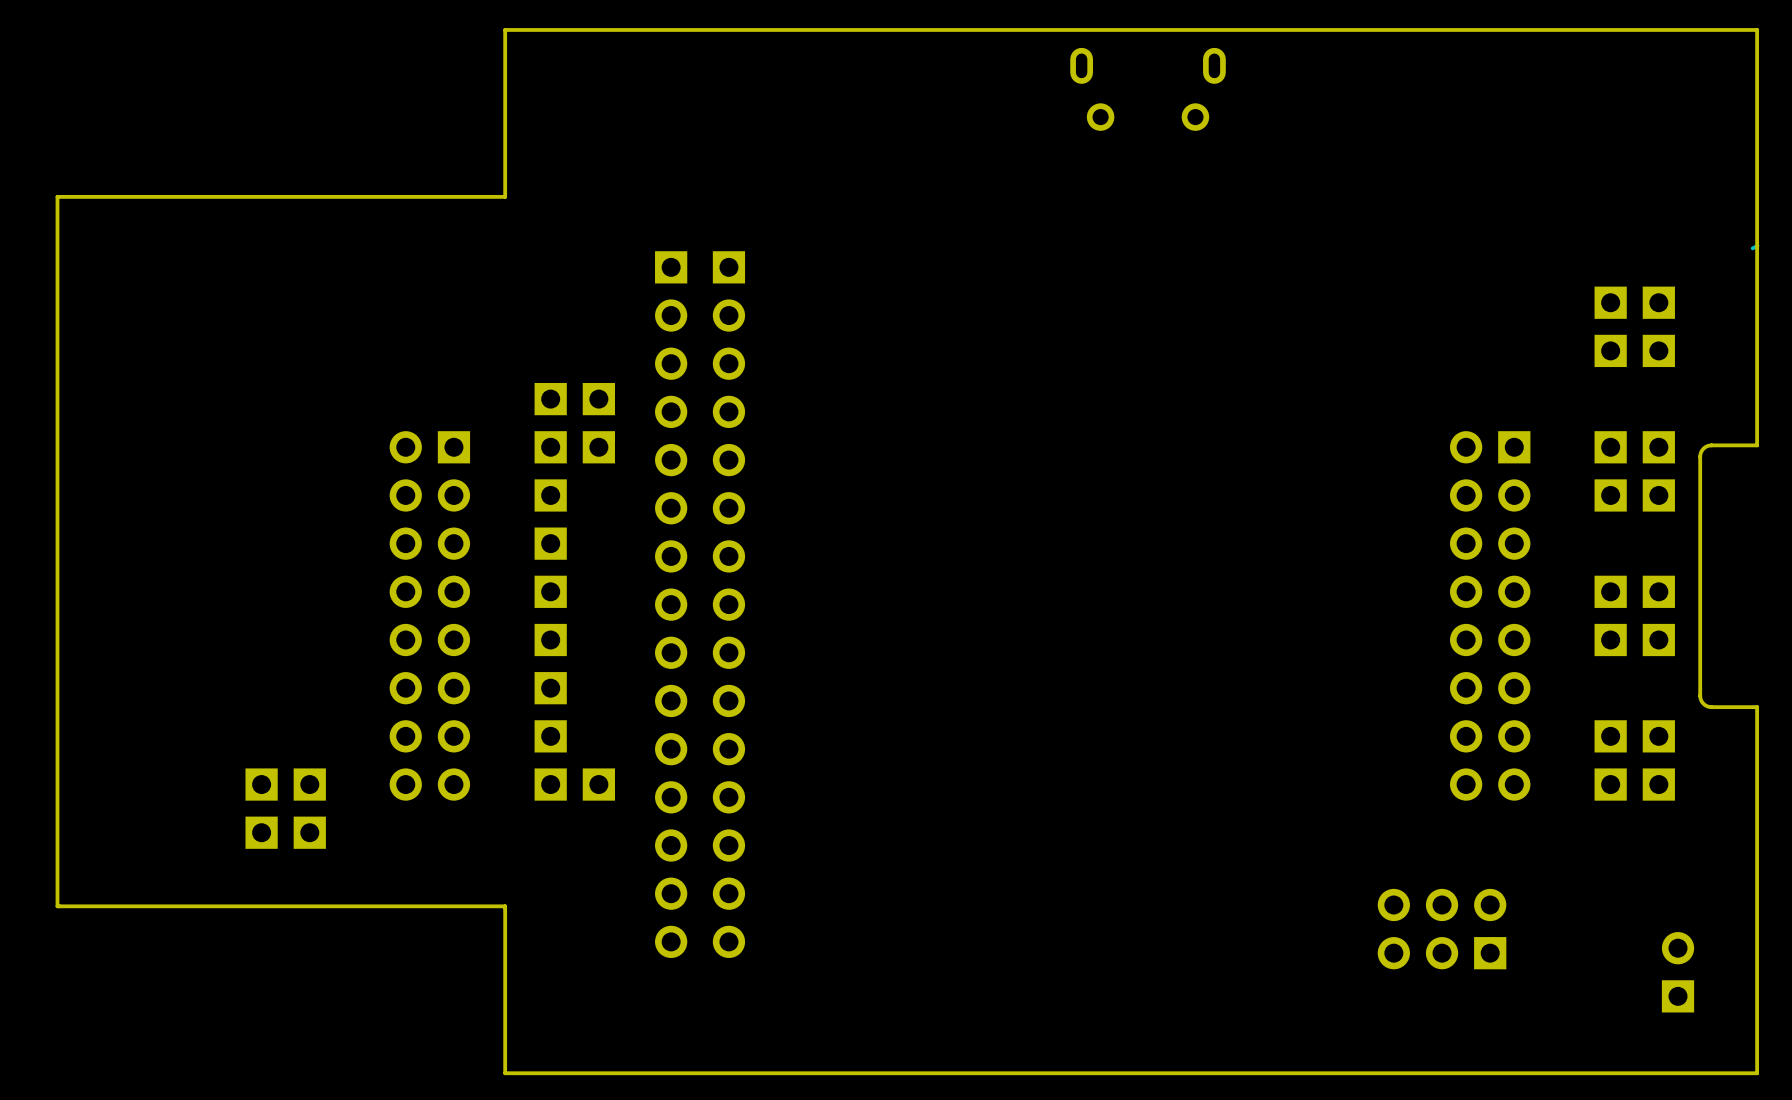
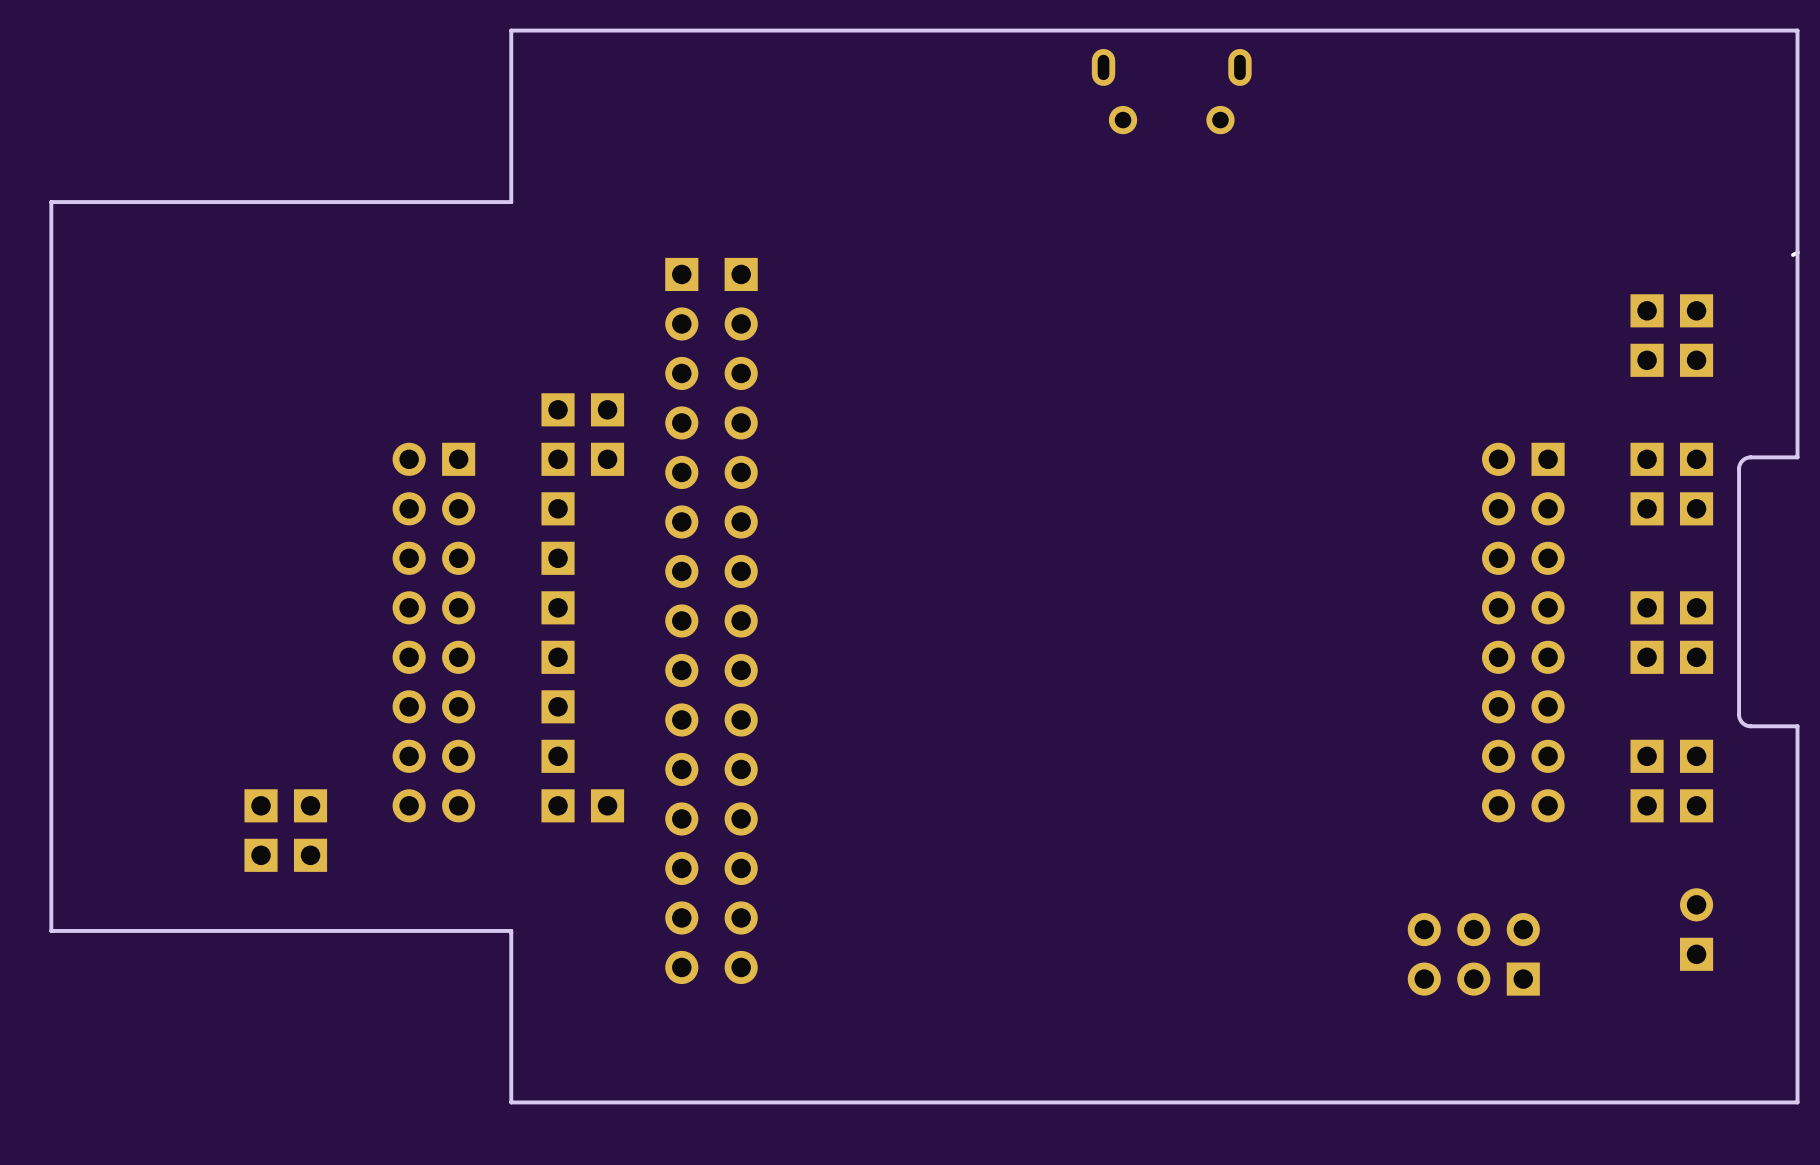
part position: (1678, 972) -> (1696, 929)

